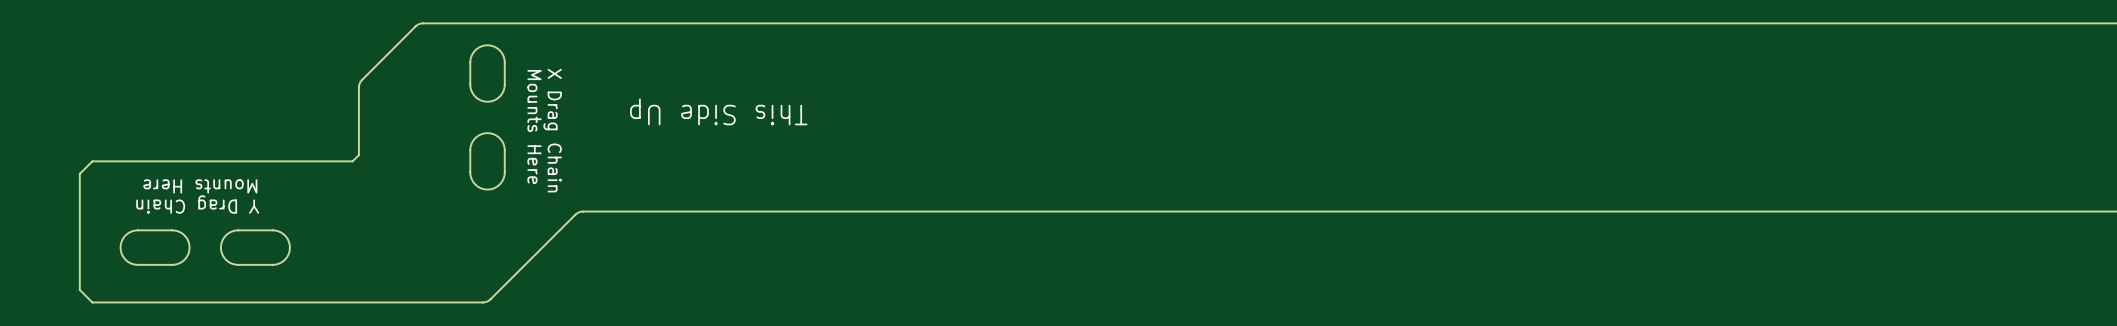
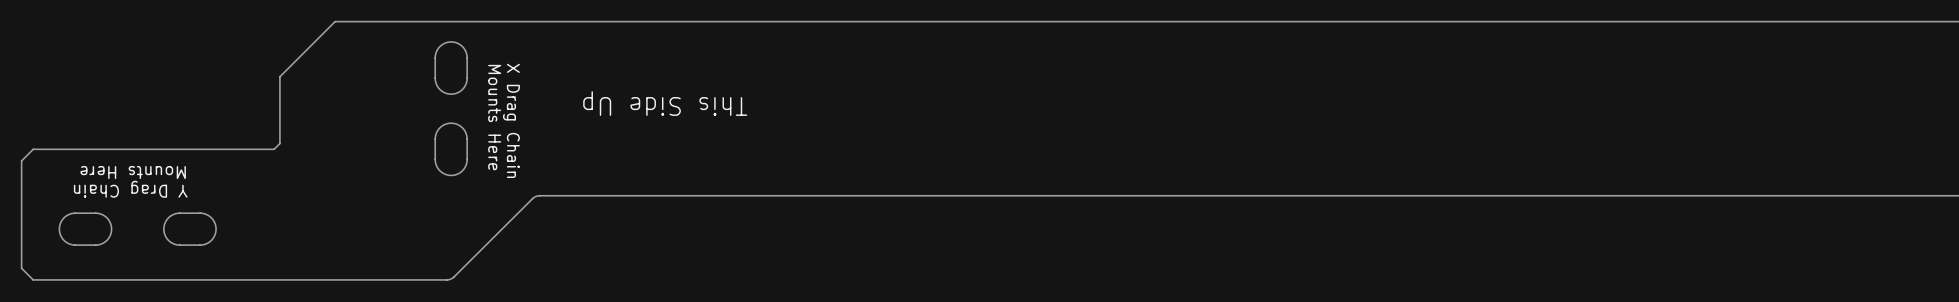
board edge: (423, 23) (415, 26) (359, 83) (358, 155) (352, 161) (296, 161) -> (391, 21) (335, 21) (279, 76) (279, 143) (274, 149)
board edge: (92, 161) (79, 173) (79, 289) (92, 302) -> (85, 149) (33, 149) (21, 160) (21, 268) (33, 279) (85, 279)
text position: Mounts Here (200, 186) -> Mounts Here (133, 172)
text position: Y Drag Chain (197, 204) -> Y Drag Chain (130, 189)
board edge: none -> (75, 213) (97, 213) (105, 216) (111, 227) (108, 238) (97, 244) (73, 244) (65, 241) (59, 233) (59, 225) (65, 216) (75, 213)
board edge: (137, 230) (172, 230) (180, 232) (188, 243) (187, 256) (180, 262) (174, 264) (137, 264) (129, 262) (121, 254) (121, 243) (127, 233) (137, 230) -> none
board edge: none -> (179, 213) (202, 213) (209, 216) (215, 227) (212, 238) (202, 244) (177, 244) (170, 241) (164, 233) (164, 225) (170, 216) (179, 213)
board edge: (238, 230) (272, 230) (281, 232) (289, 243) (287, 256) (281, 262) (274, 264) (238, 264) (229, 262) (222, 254) (221, 243) (227, 233) (238, 230) -> none

